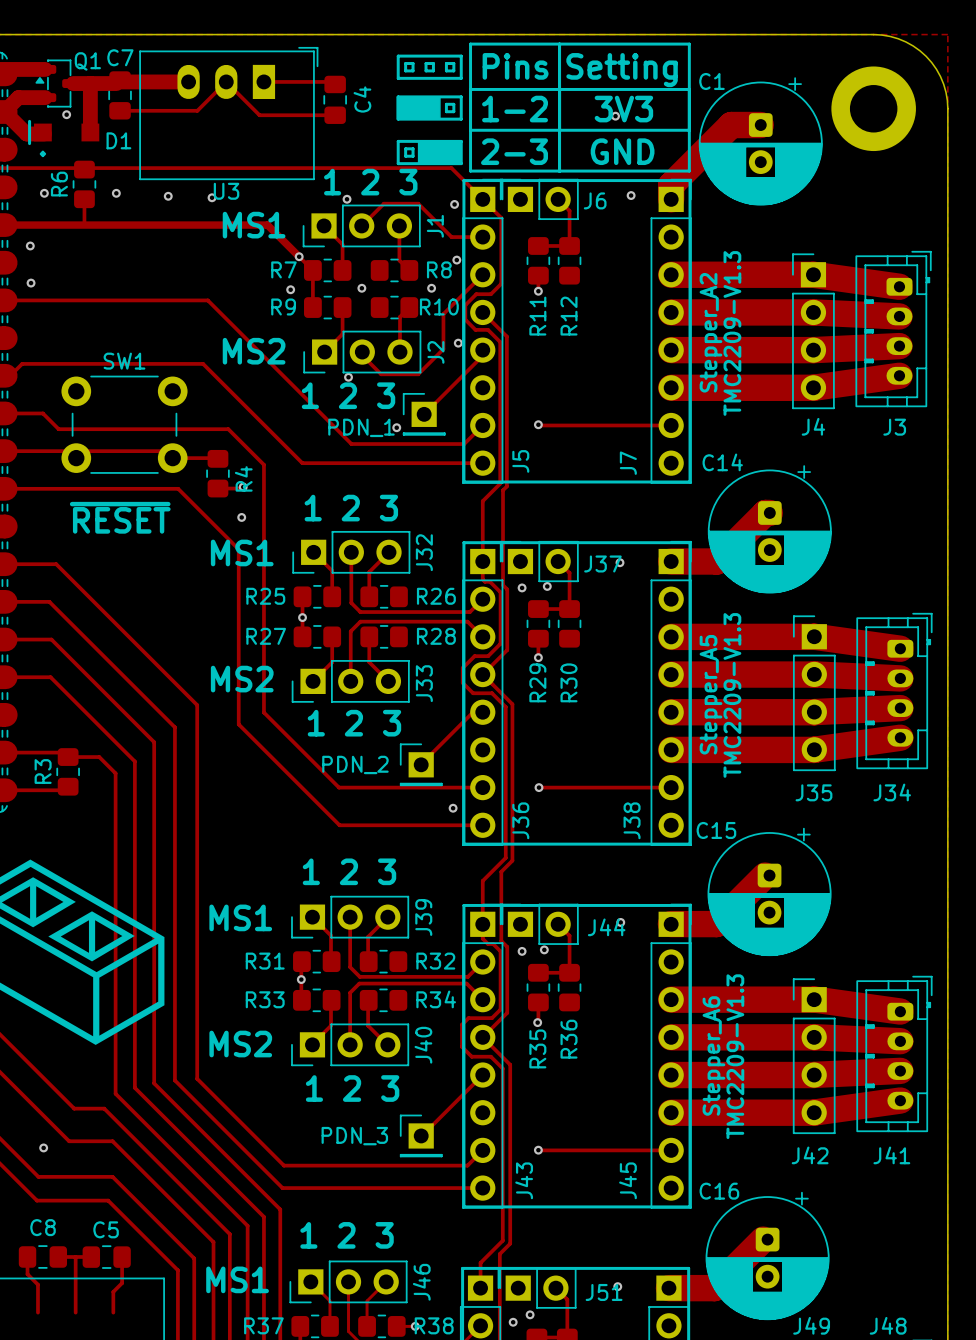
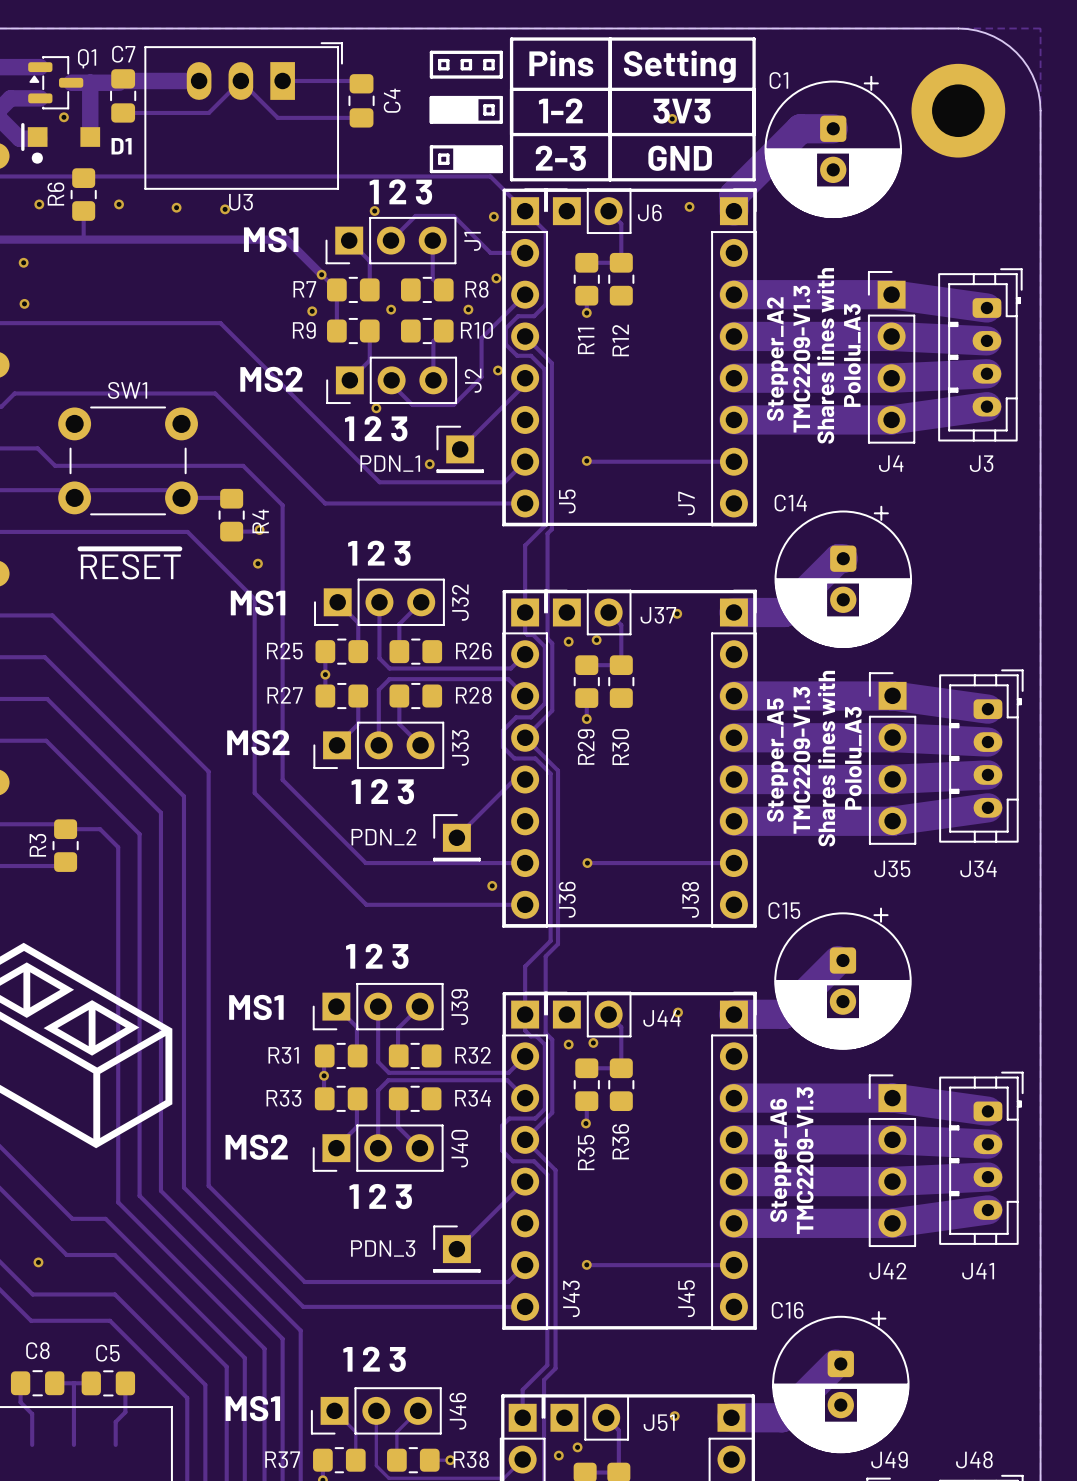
text: none -> Pololu_A3 (852, 355)
text: none -> Shares lines with (825, 355)
text: none -> Pololu_A3 (853, 758)
text: none -> Shares lines with (826, 758)

